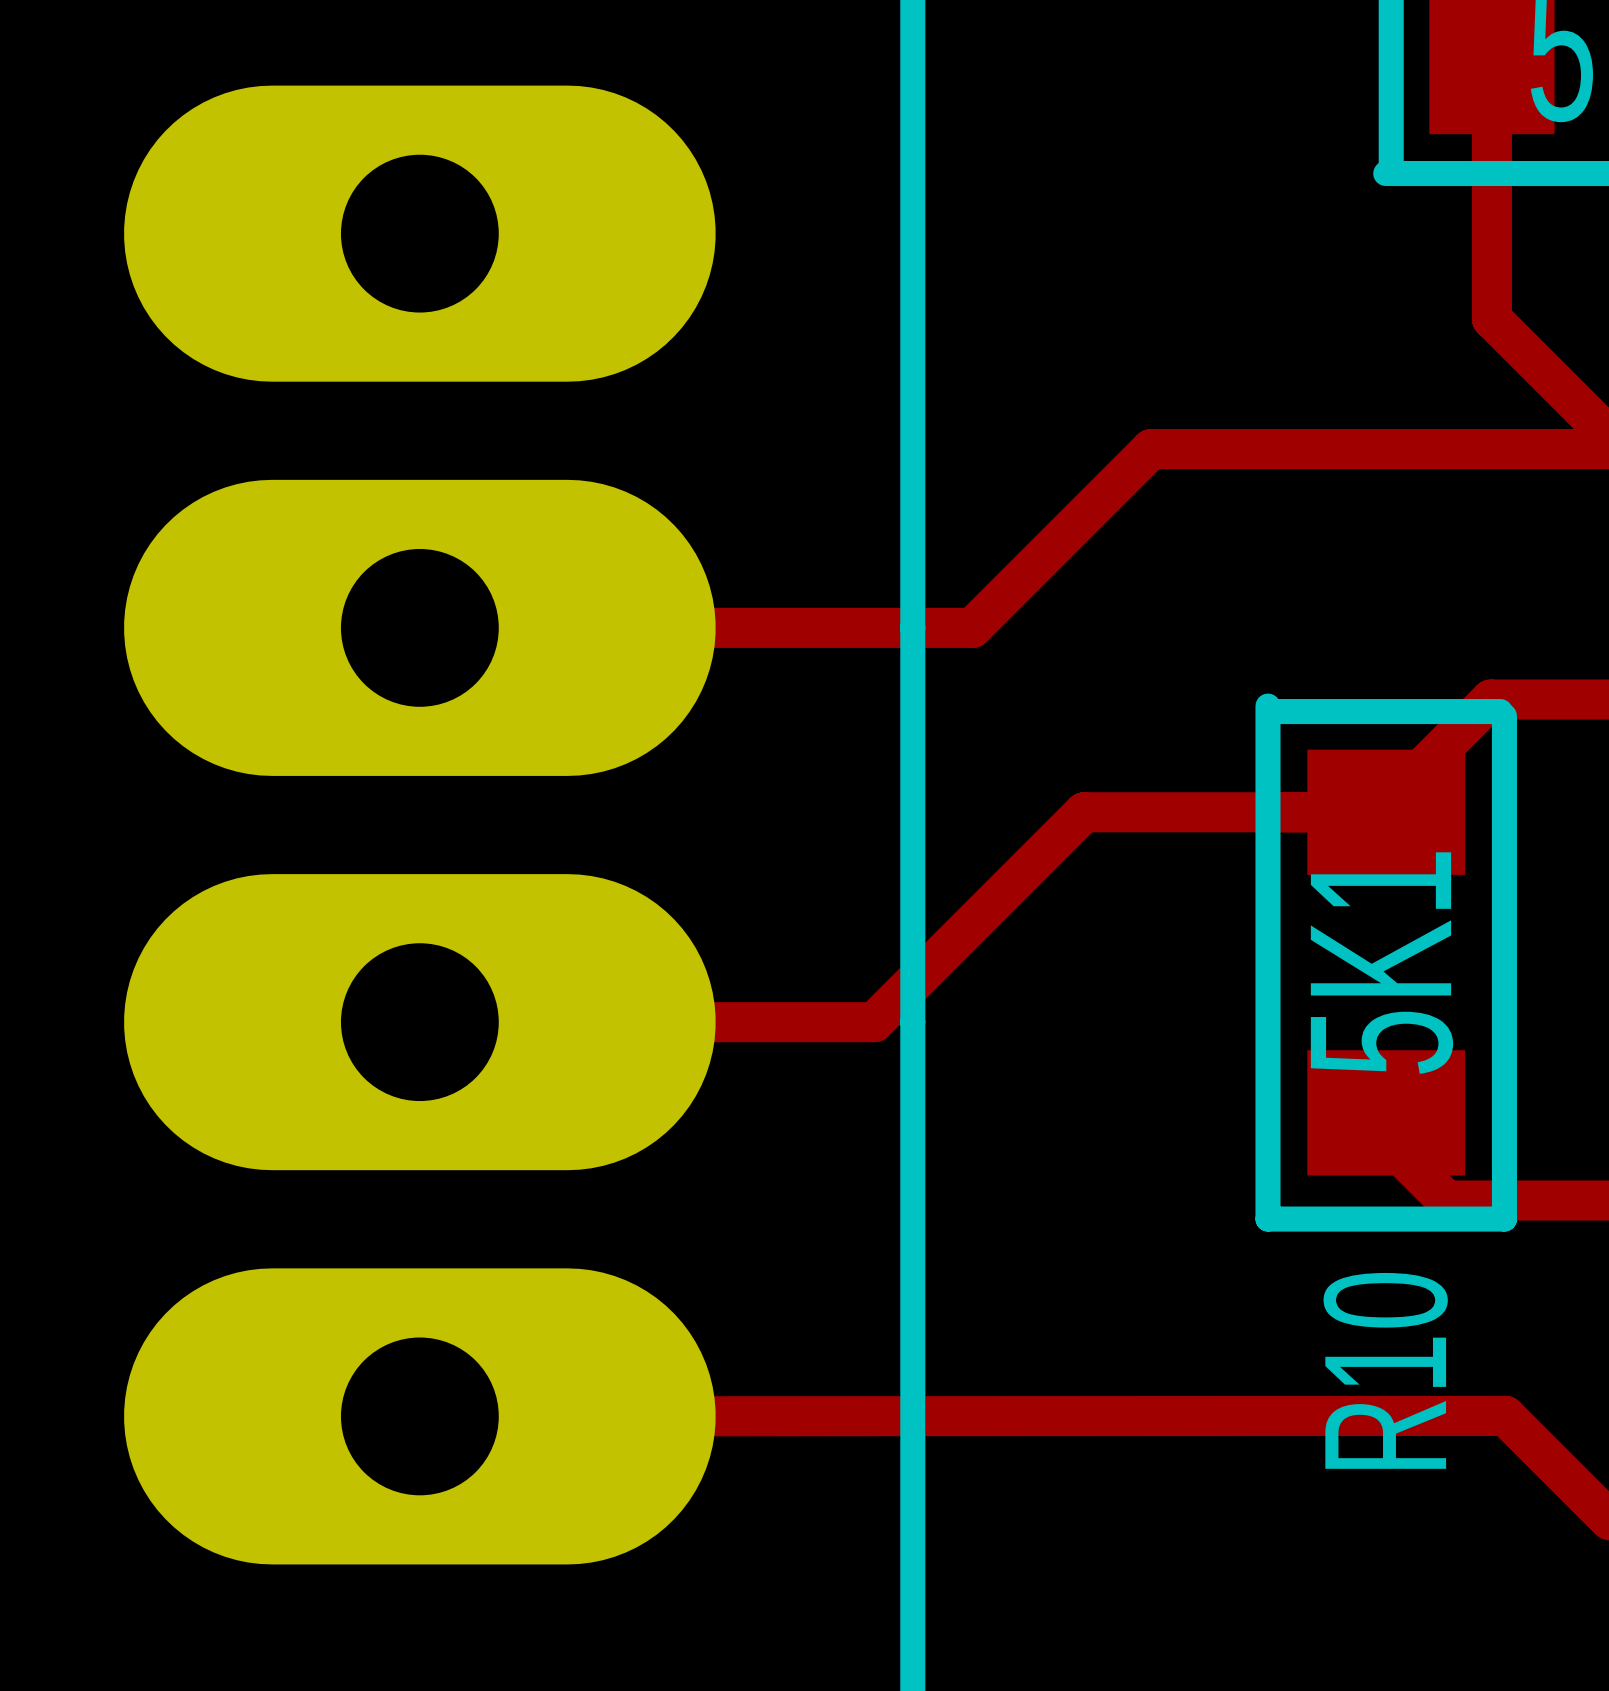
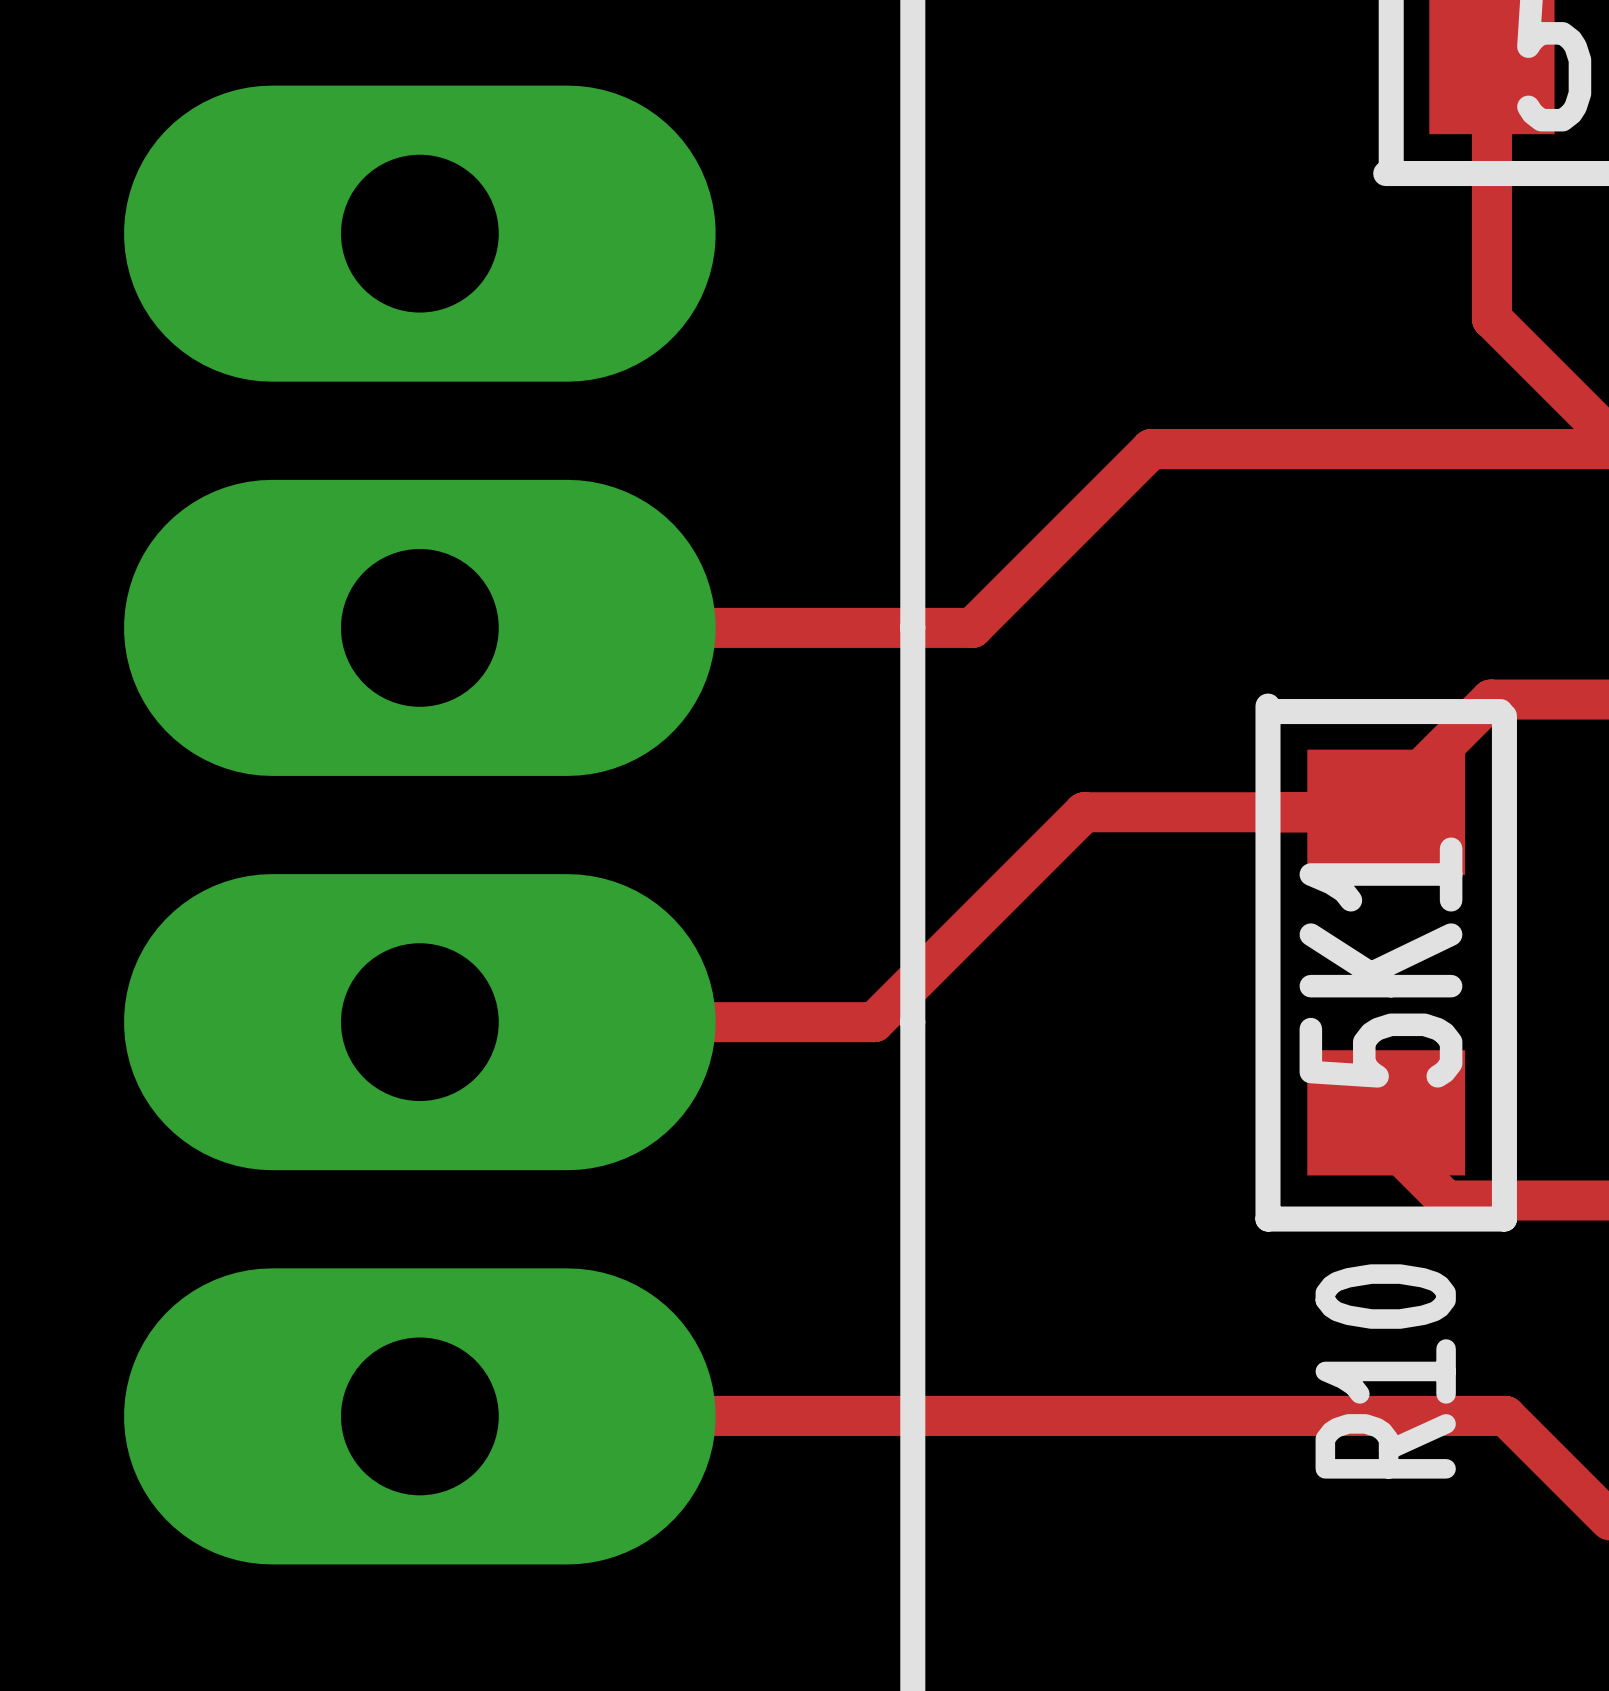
track: (419, 1416) (1505, 1415) -> (431, 1420) (436, 1415) (1505, 1415)

